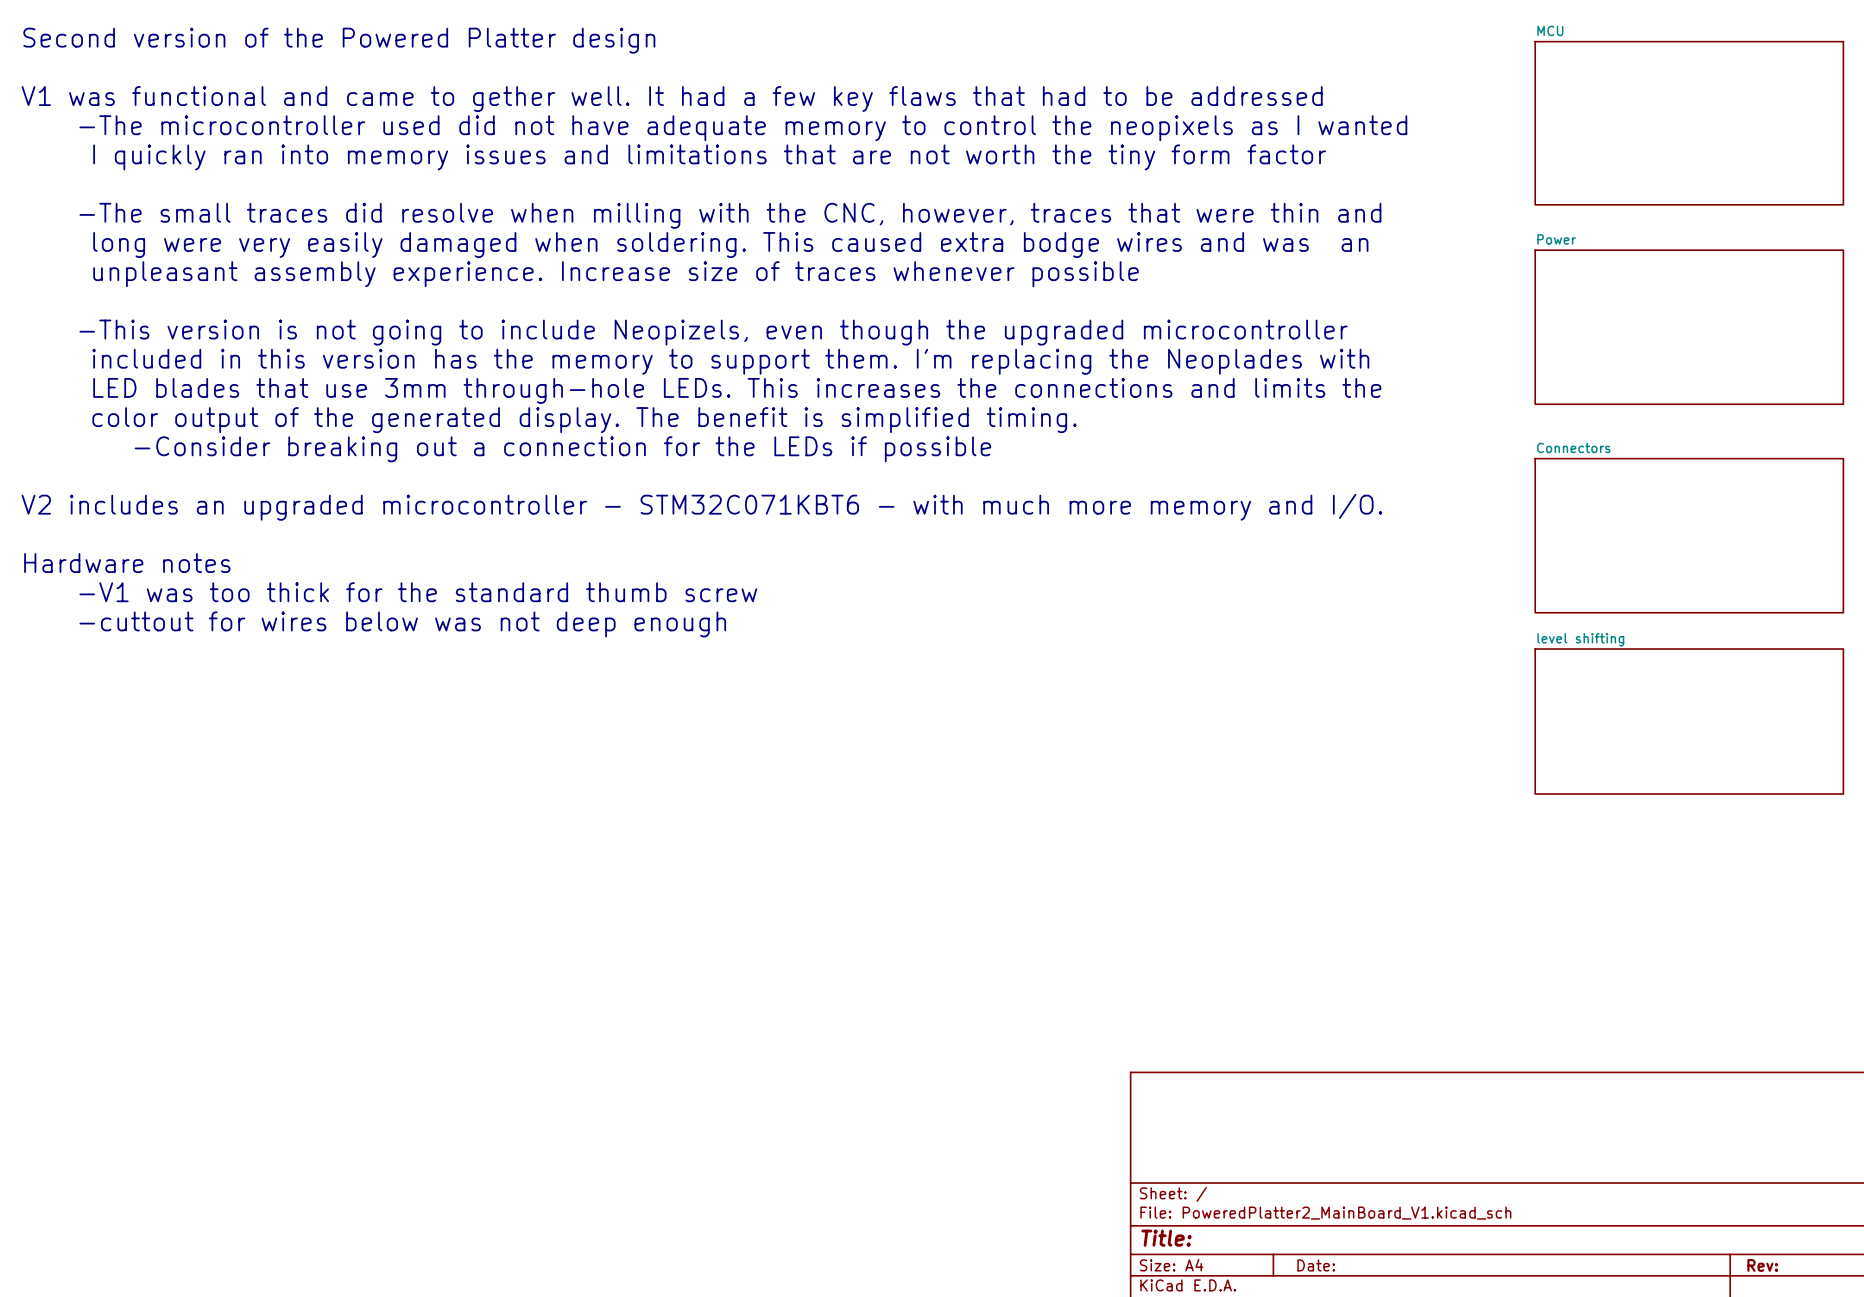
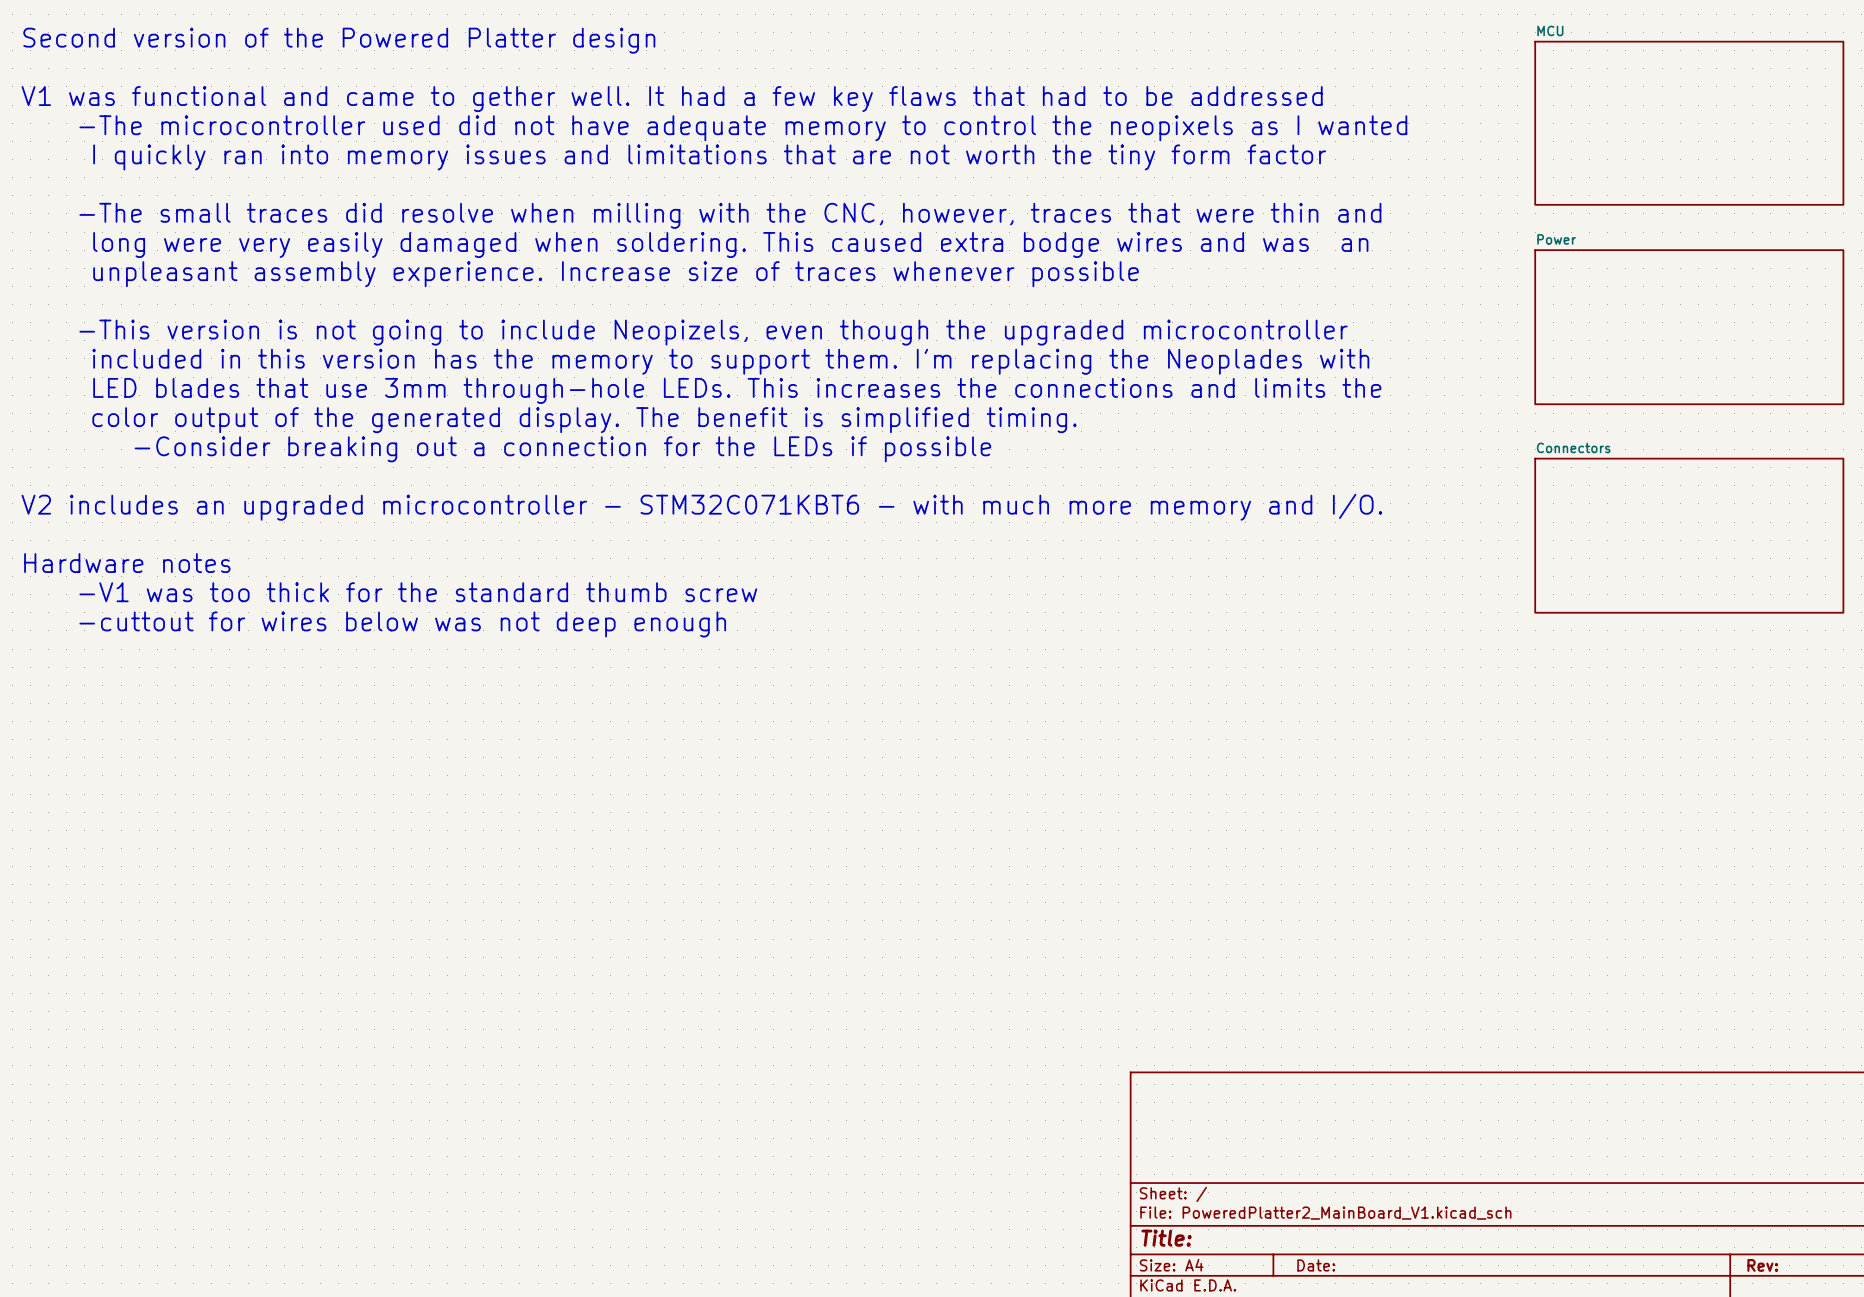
sheet level shifting: (1689, 721) -> none

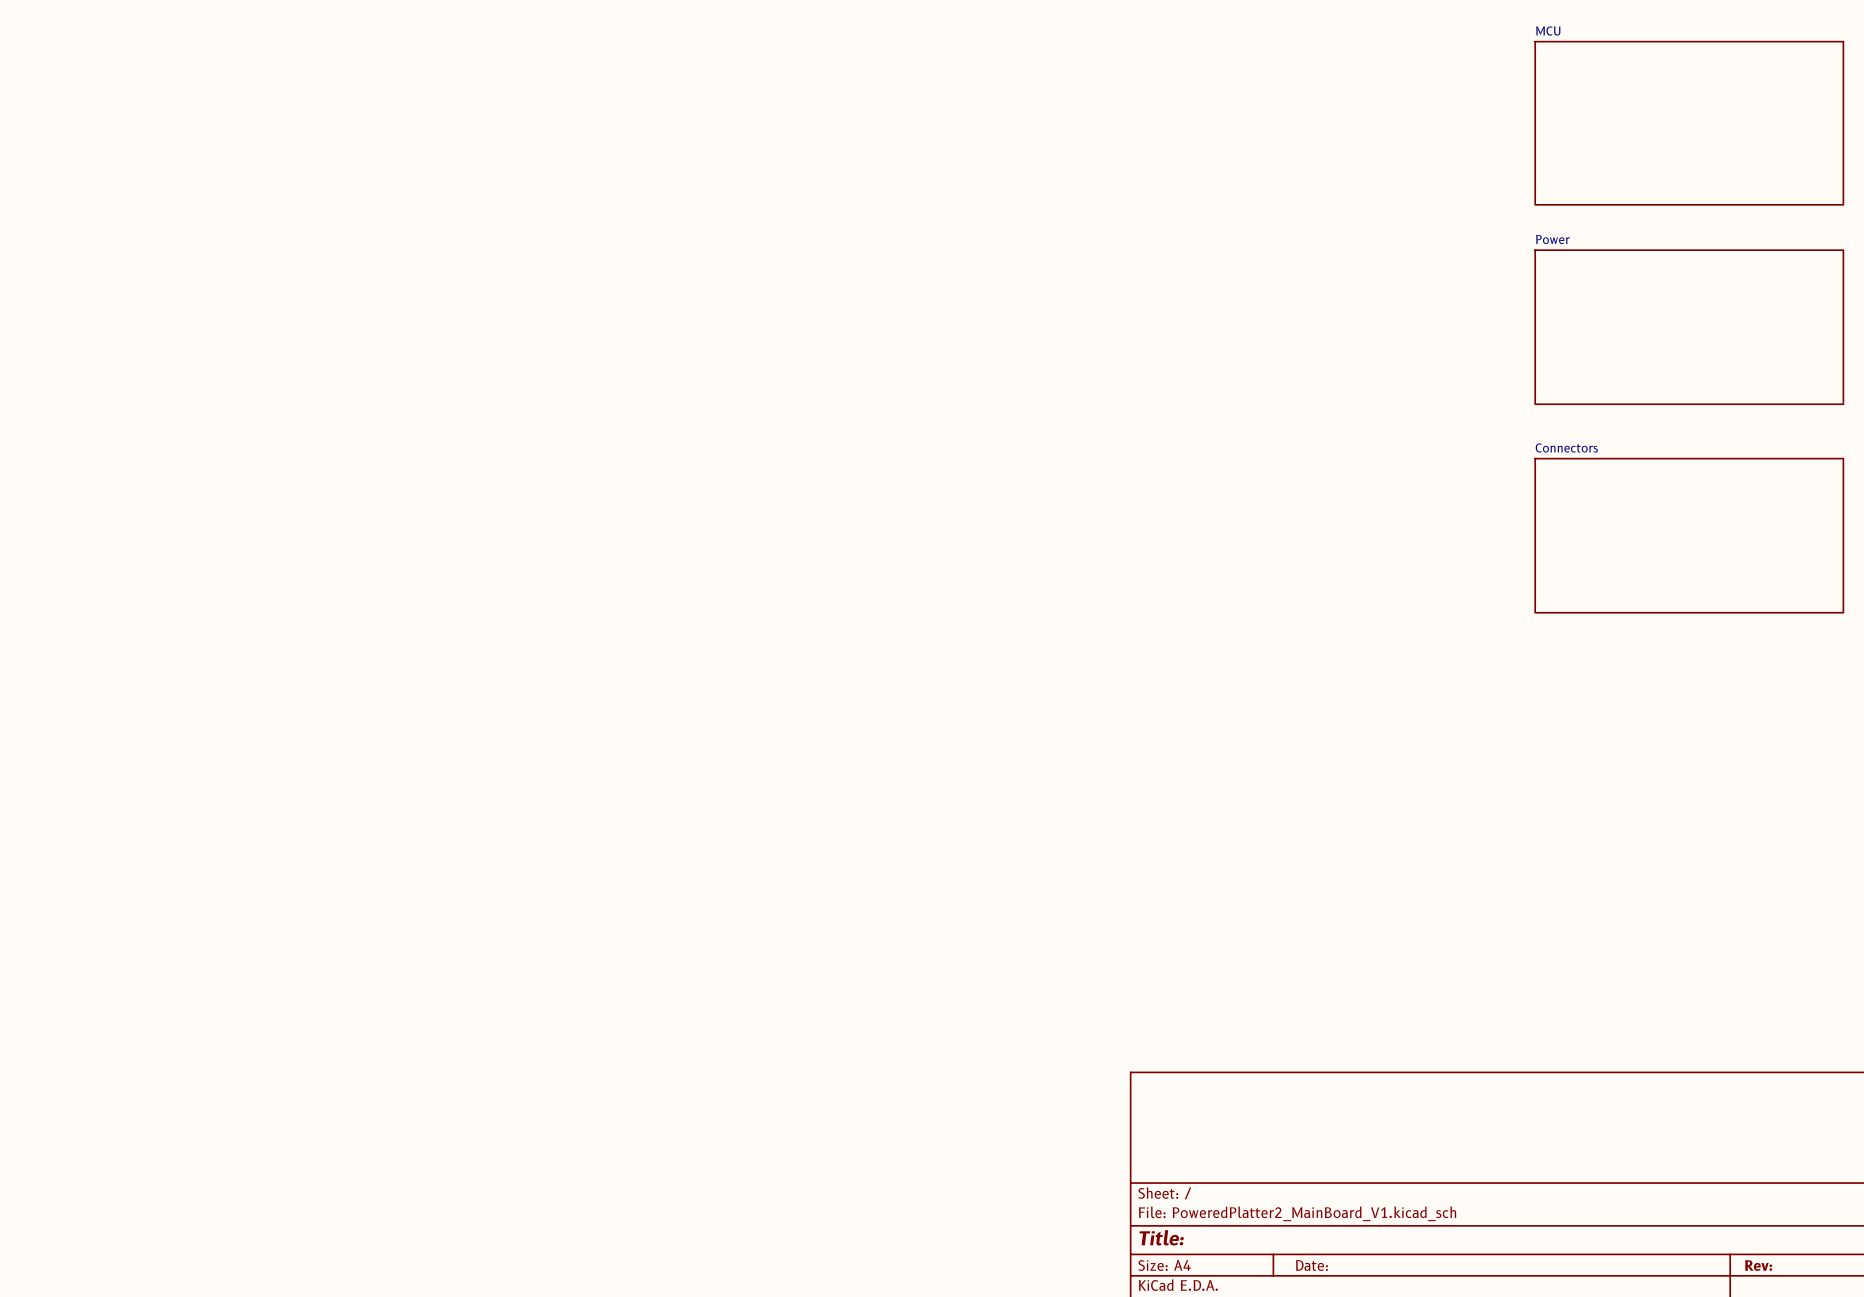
text: Second version of the Powered Platter design (339, 40) -> none
text: V1 was functional and came to gether well. It had a few key flaws that had to be addressed (672, 99) -> none
text: -The microcontroller used did not have adequate memory to control the neopixels as I wanted (743, 128) -> none
text: I quickly ran into memory issues and limitations that are not worth the tiny form factor (709, 157) -> none
text: -The small traces did resolve when milling with the CNC, however, traces that were thin and (730, 215) -> none
text: long were very easily damaged when soldering. This caused extra bodge wires and was an (730, 244) -> none
text: unpleasant assembly experience. Increase size of traces whenever possible (615, 274) -> none
text: -This version is not going to include Neopizels, even though the upgraded microcontroller (713, 332) -> none
text: included in this version has the memory to support them. I'm replacing the Neoplades with (730, 361) -> none
text: LED blades that use 3mm through-hole LEDs. This increases the connections and limits the (737, 390) -> none
text: color output of the generated display. The benefit is simplified timing. (584, 420) -> none
text: -Consider breaking out a connection for the LEDs if possible (562, 449) -> none
text: V2 includes an upgraded microcontroller - STM32C071KBT6 - with much more memory and I/O. (701, 507) -> none
text: Hardware notes (127, 563) -> none
text: -V1 was too thick for the standard thumb screw (418, 592) -> none
text: -cuttout for wires below was not deep enough (402, 624) -> none

